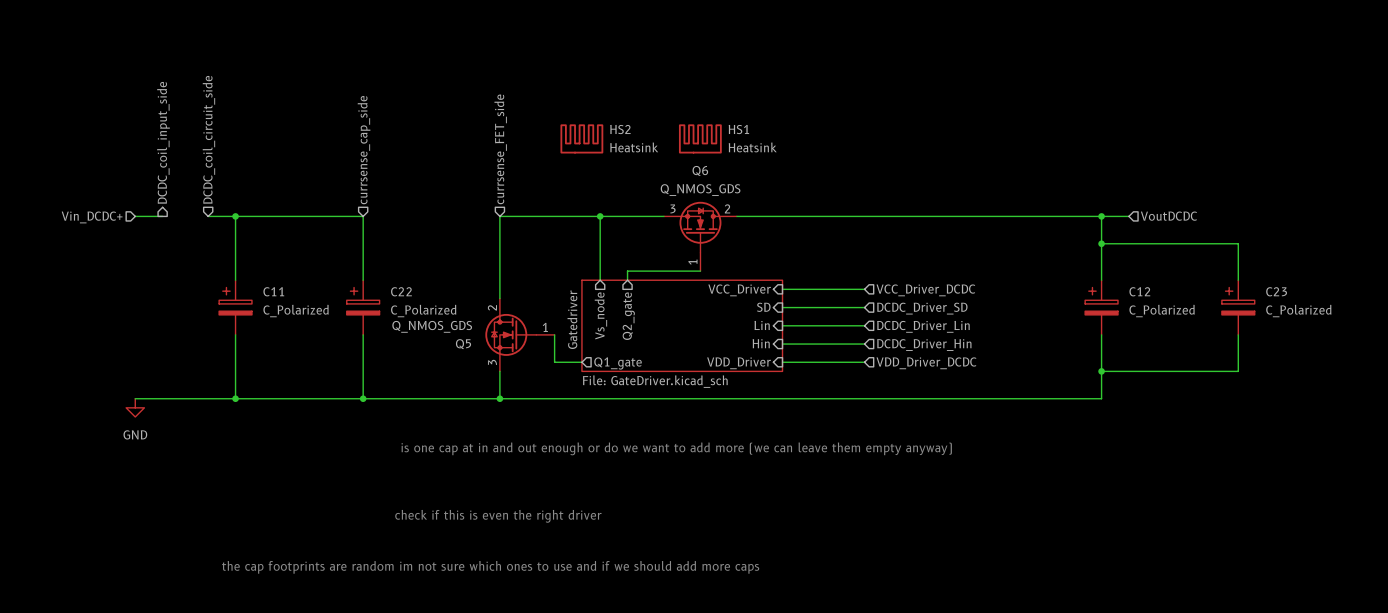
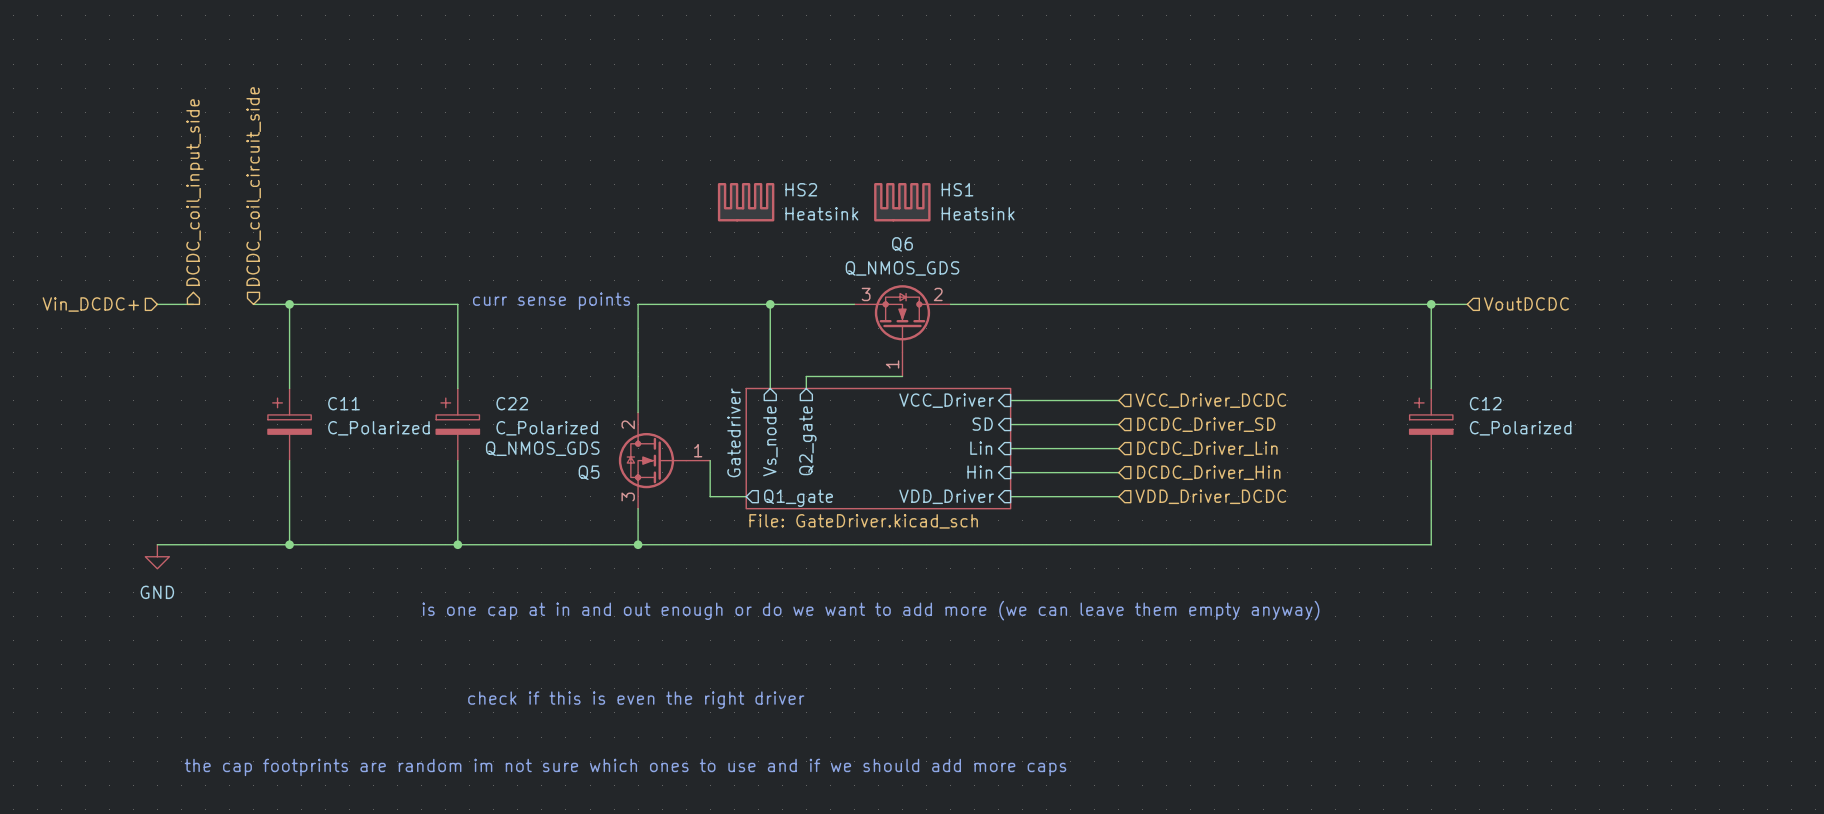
hierarchical label: currsense_FET_side (500, 149) -> none
hierarchical label: currsense_cap_side (364, 150) -> none
text: none -> curr sense points (551, 301)
wire: (1101, 243) (1238, 243) (1238, 280) -> none
junction: (1101, 243) -> none
C23: C_Polarized (1238, 307) -> none
wire: (1238, 334) (1238, 371) (1101, 371) -> none
junction: (1101, 371) -> none

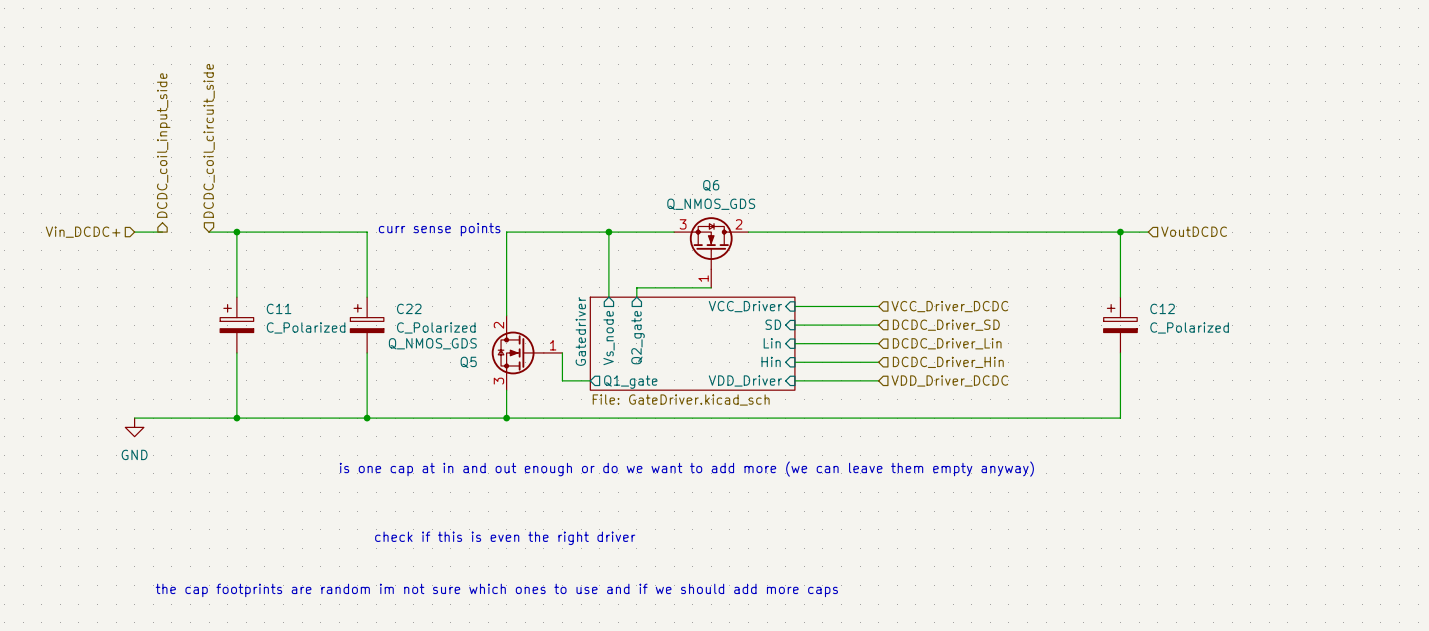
HS2: Heatsink (746, 202) -> none
HS1: Heatsink (902, 202) -> none

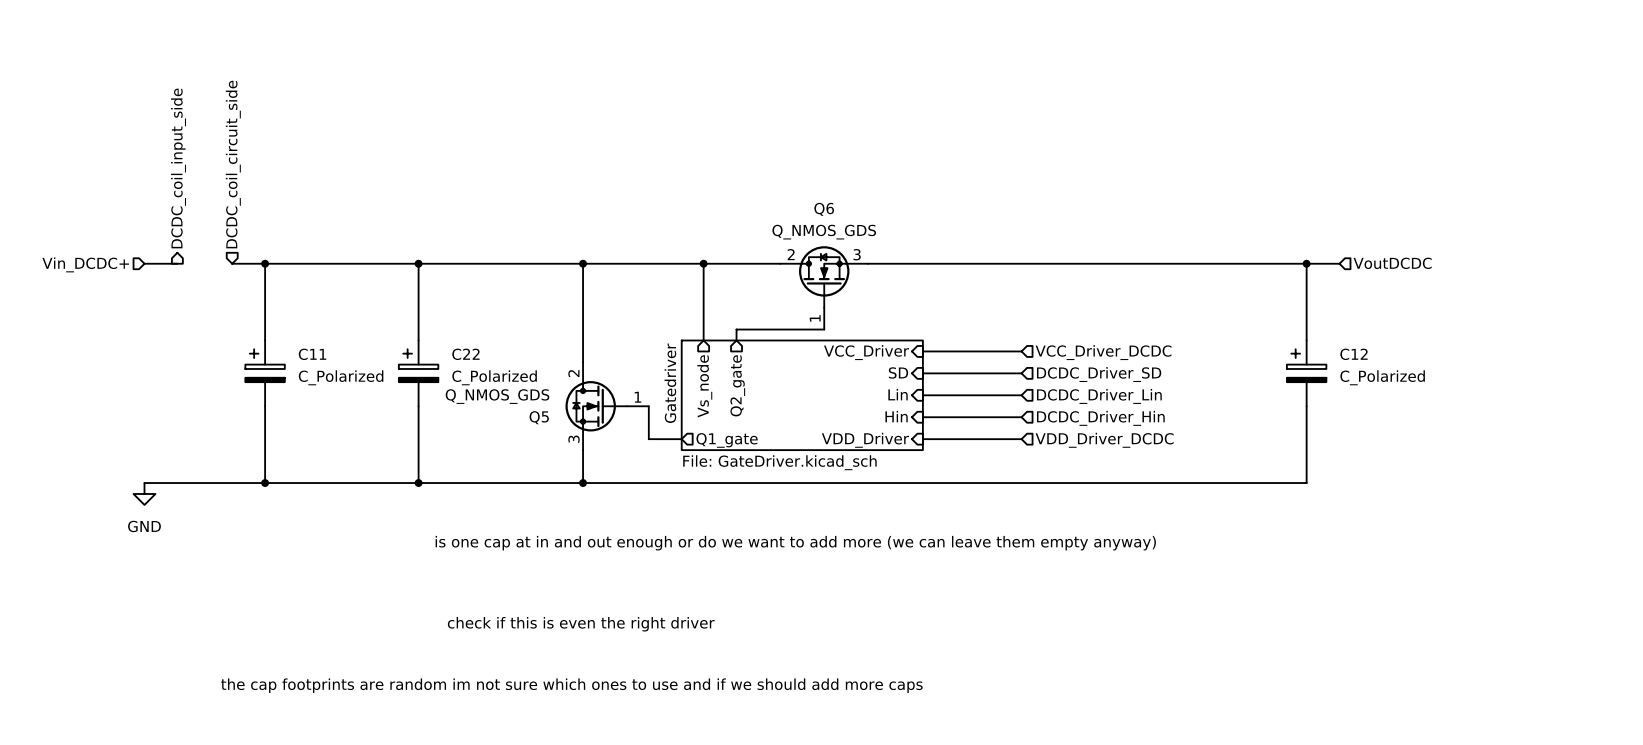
text: curr sense points (439, 229) -> none
wire: none -> (418, 263) (583, 263)
junction: none -> (418, 263)
junction: none -> (583, 263)
Q6 flip: as is (711, 243) -> left-right (824, 276)

